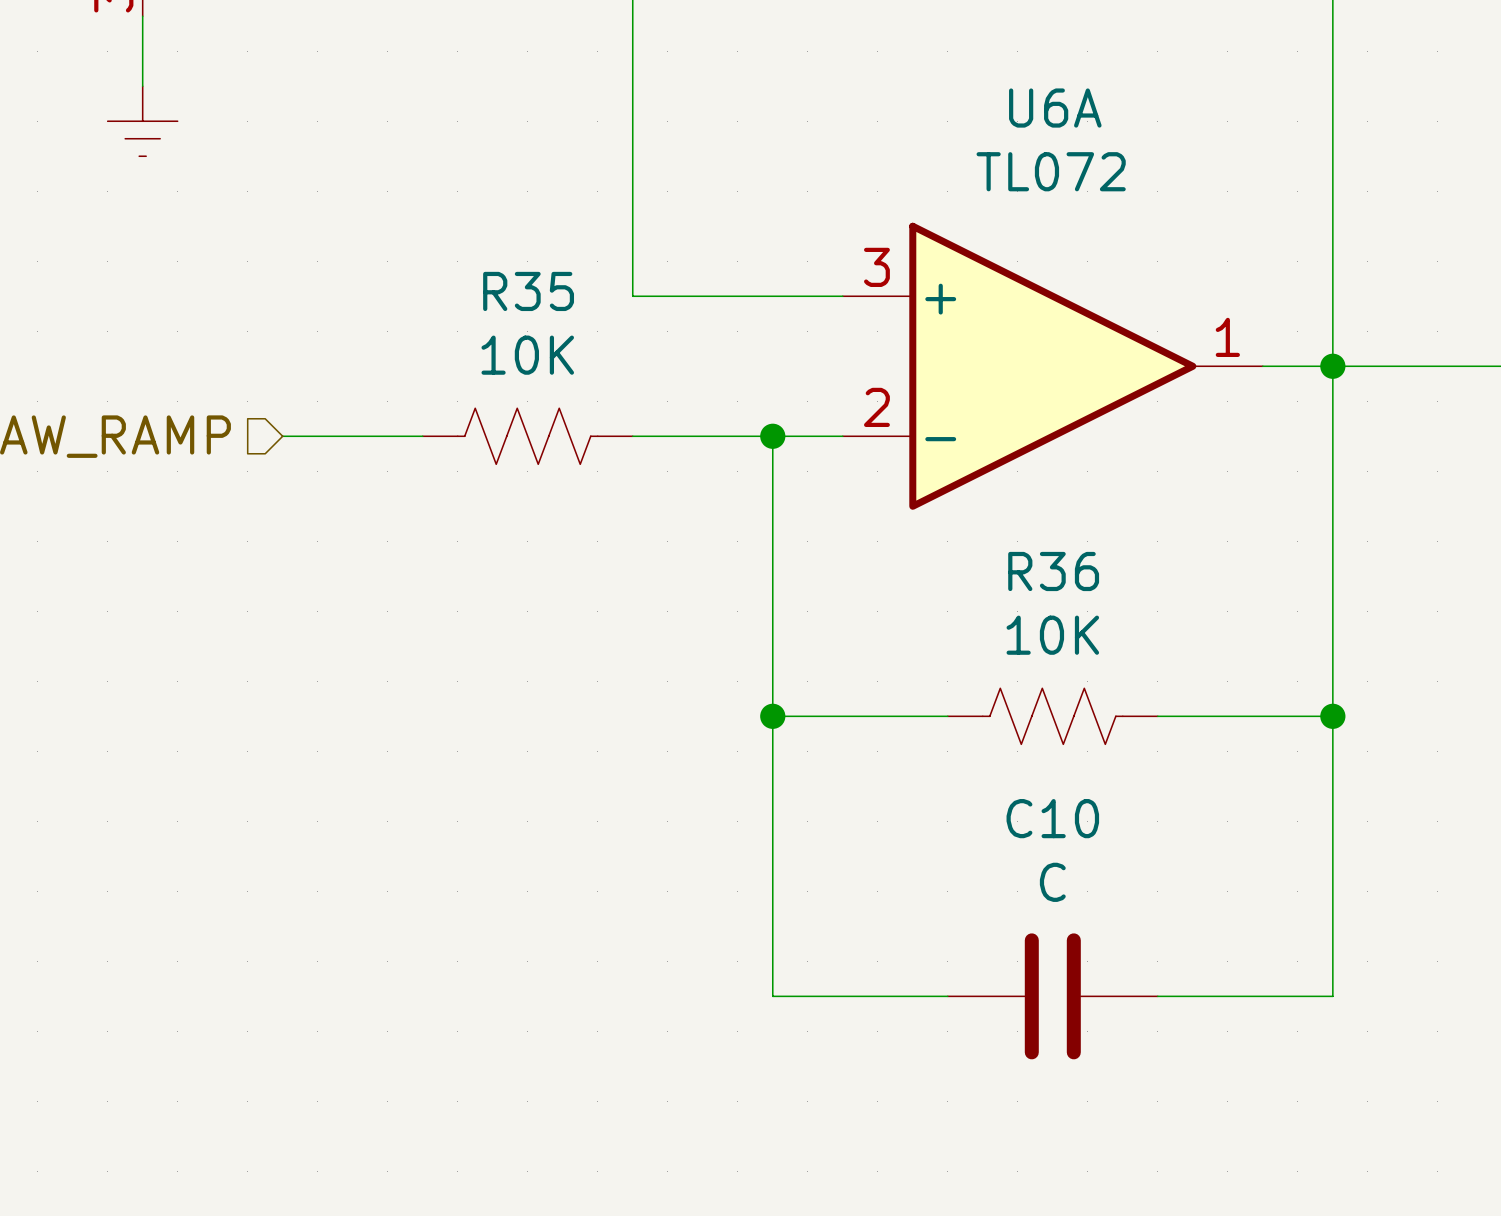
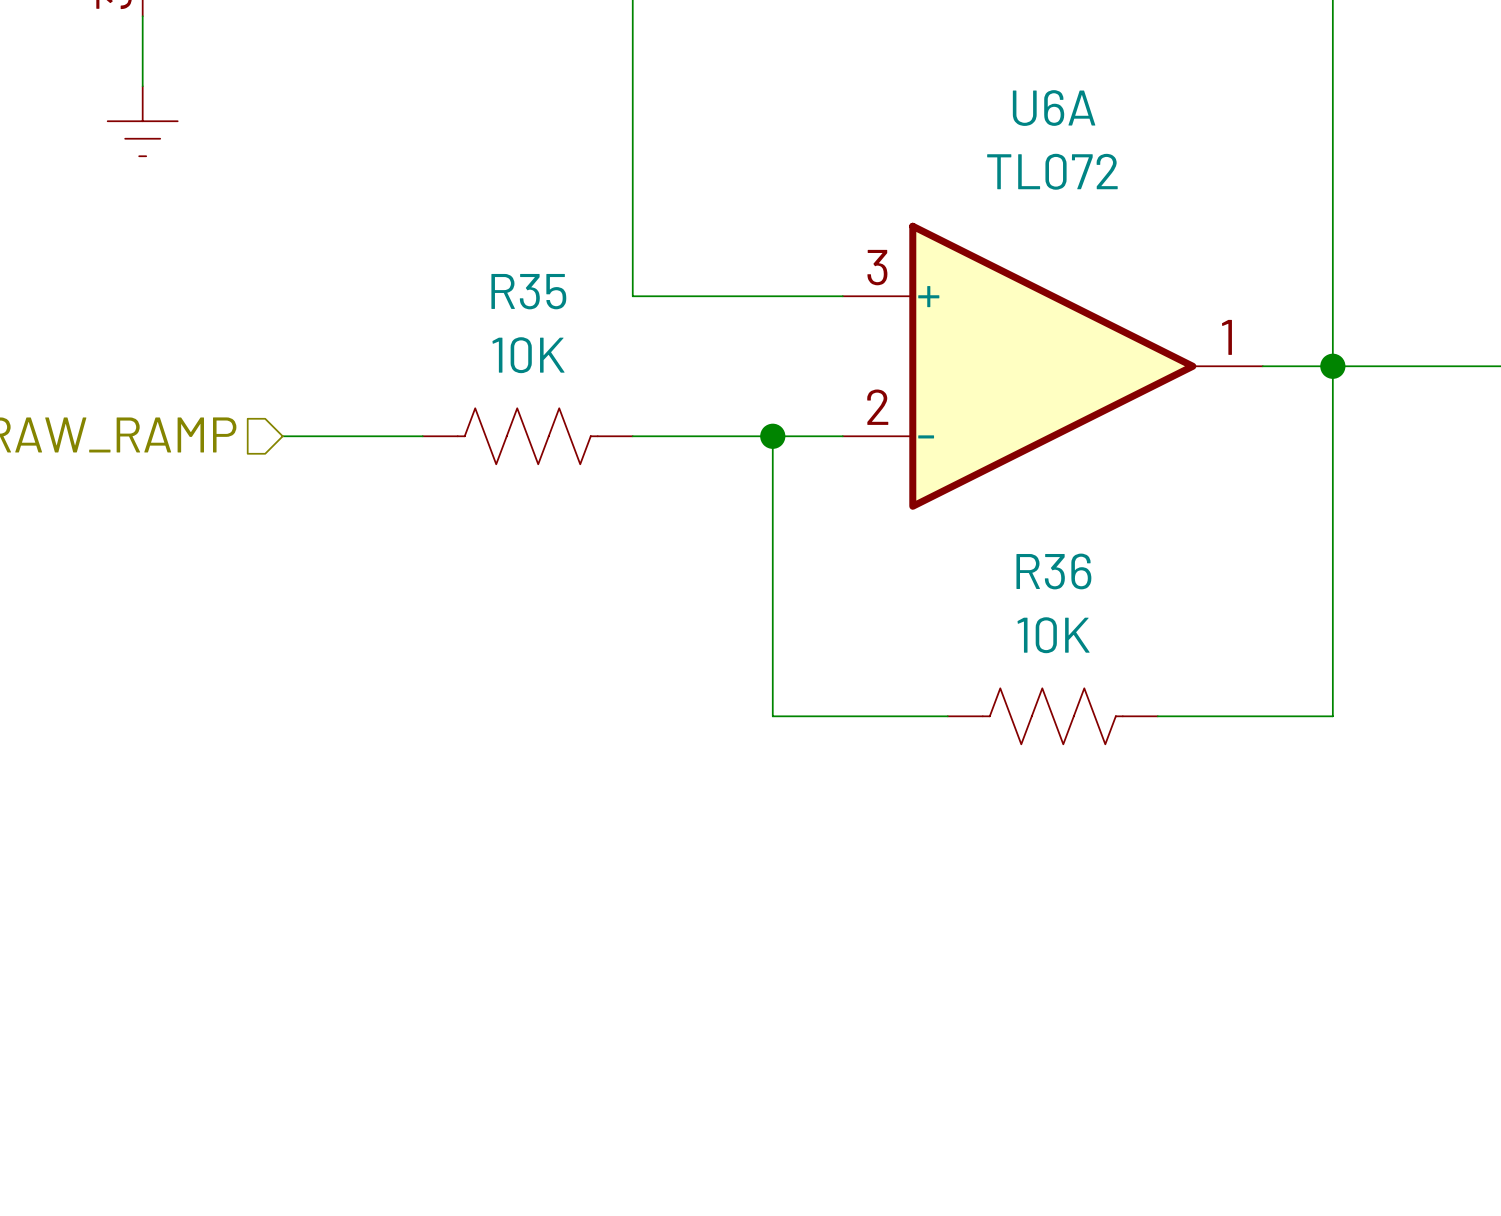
wire: (772, 716) (772, 996) (947, 996) -> none
junction: (772, 716) -> none
wire: (1332, 716) (1332, 996) (1157, 996) -> none
junction: (1332, 716) -> none
C10: C (1052, 996) -> none

